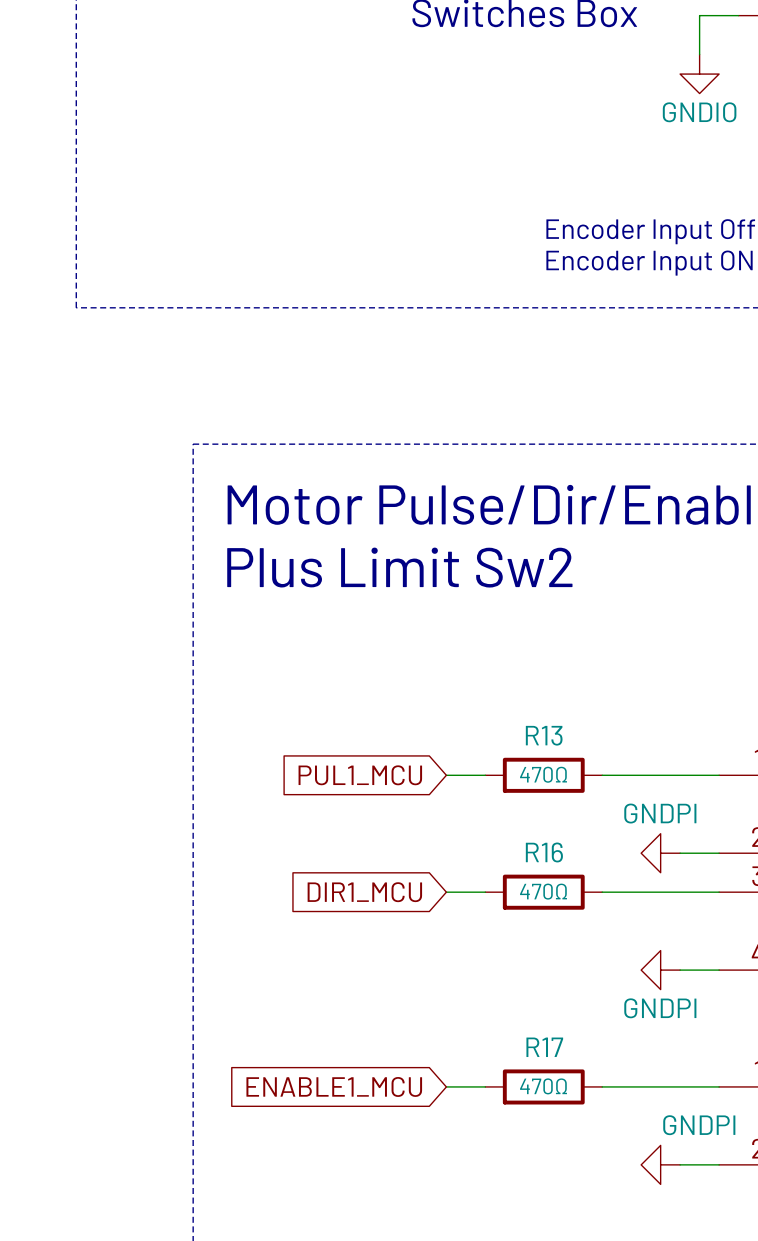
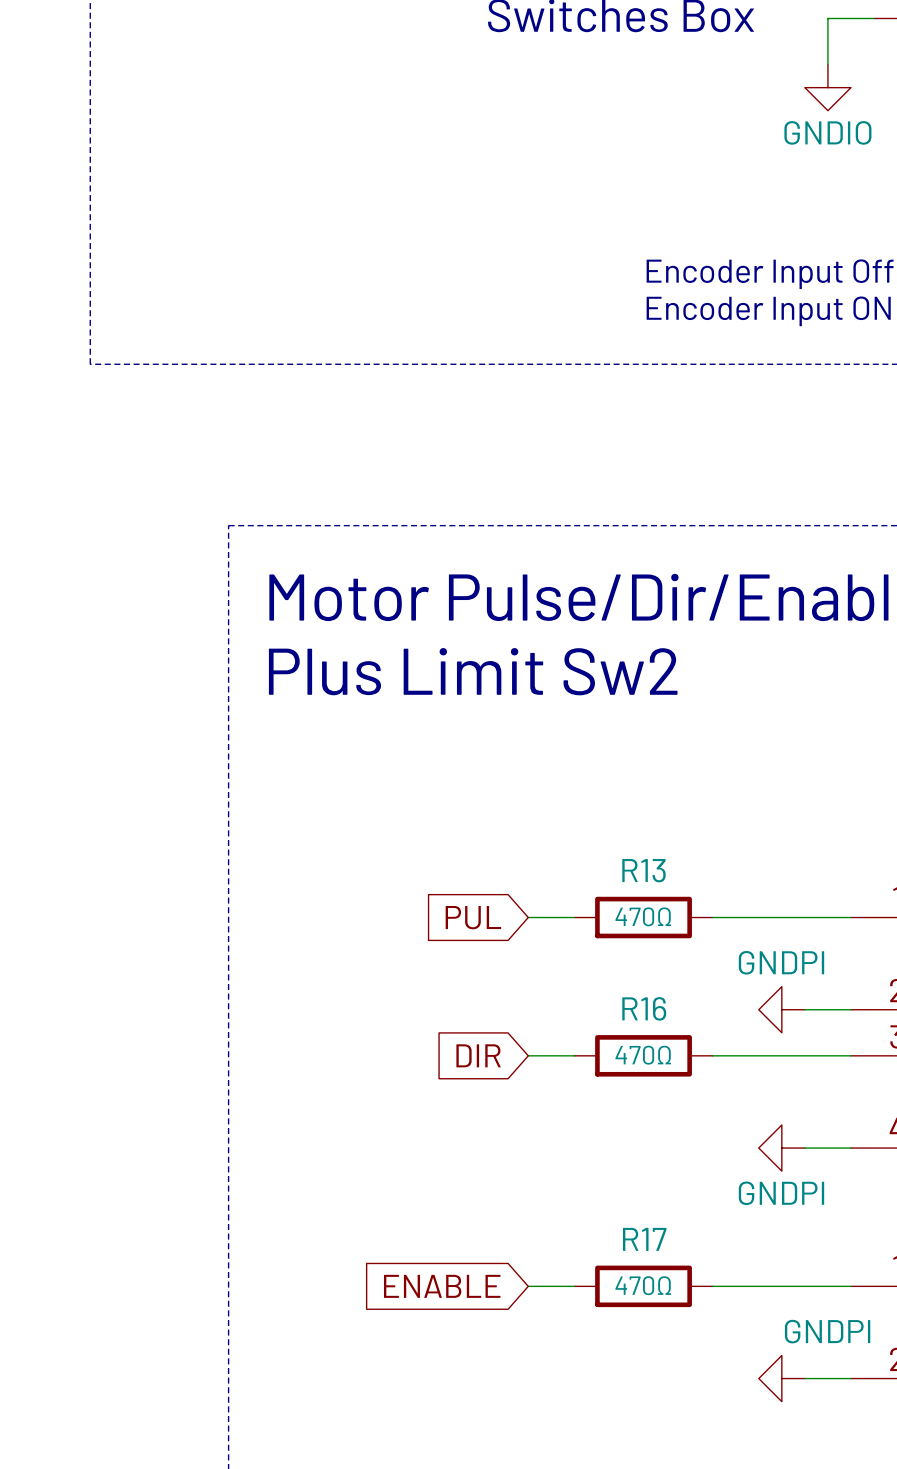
global label: PUL1_MCU (360, 775) -> PUL (473, 917)
global label: DIR1_MCU (364, 892) -> DIR (478, 1055)
global label: ENABLE1_MCU (334, 1086) -> ENABLE (442, 1286)

